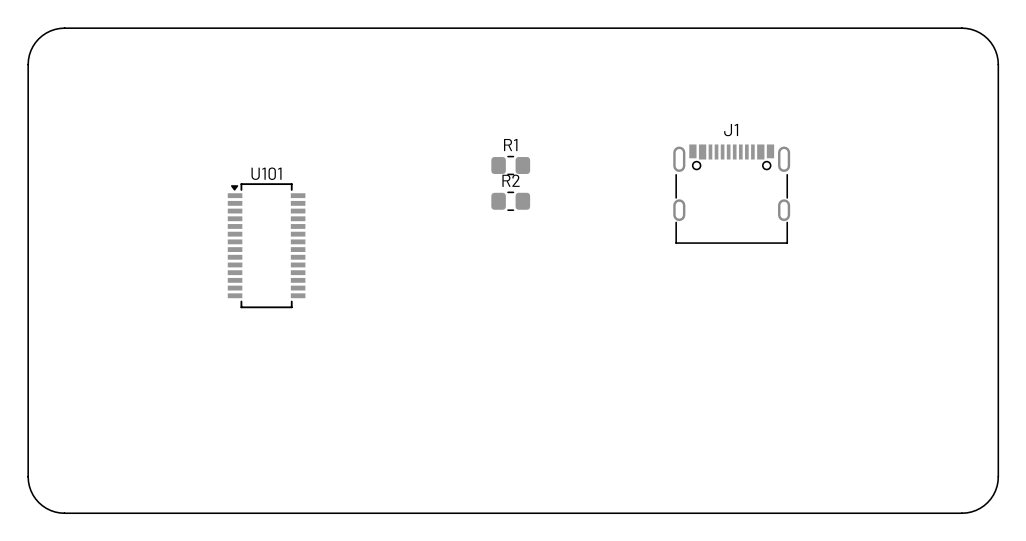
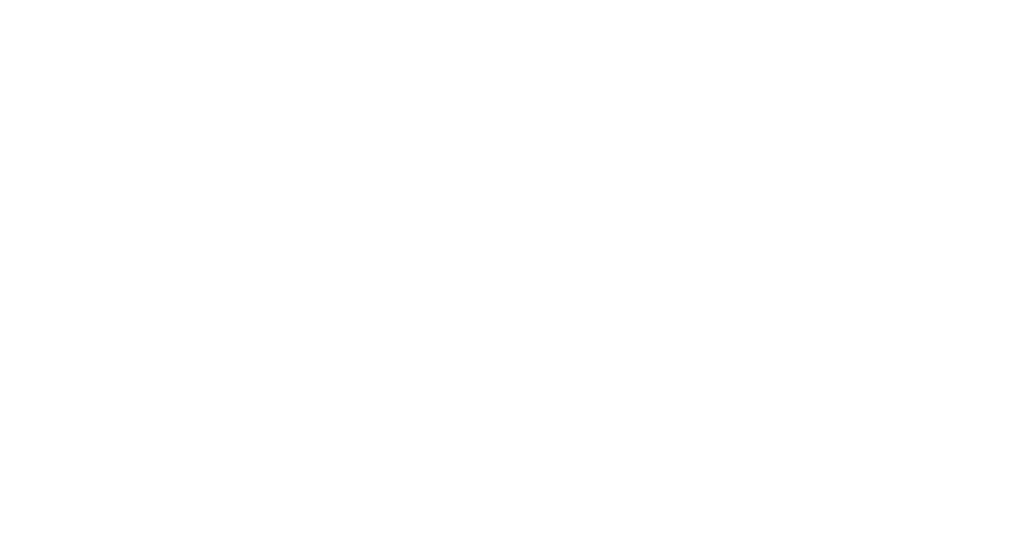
board edge: (64, 28) (961, 28) (980, 33) (993, 46) (998, 64) (998, 476) (993, 495) (980, 508) (961, 513) (64, 513) (46, 508) (33, 495) (28, 476) (28, 64) (30, 50) (38, 38) (50, 30) (64, 28) -> none
R1: (510, 165) -> none
J1: (731, 194) -> none
R2: (510, 201) -> none
U101: (266, 245) -> none

